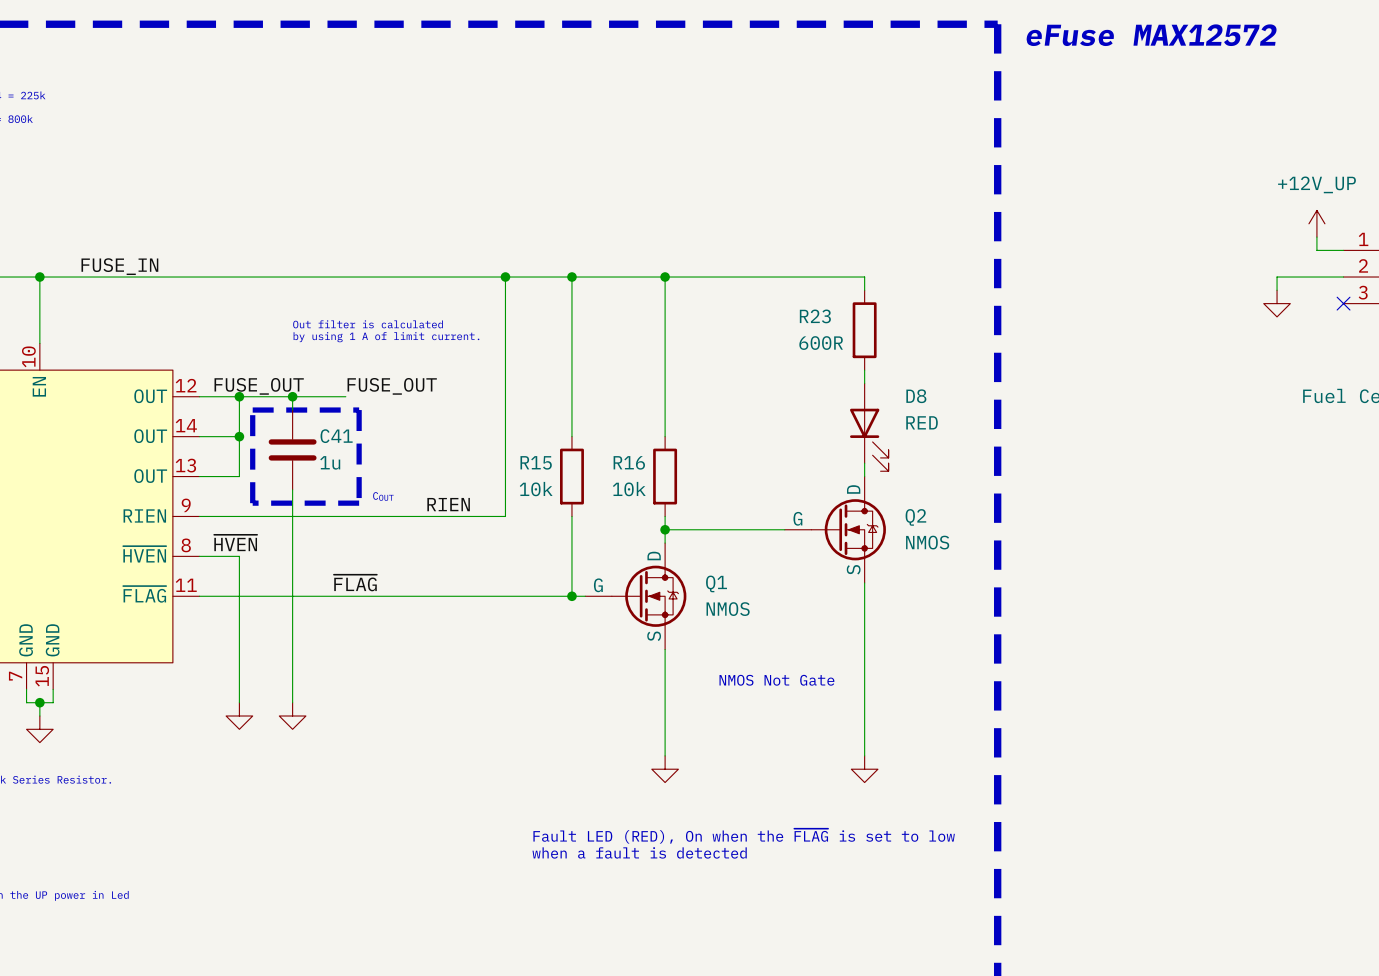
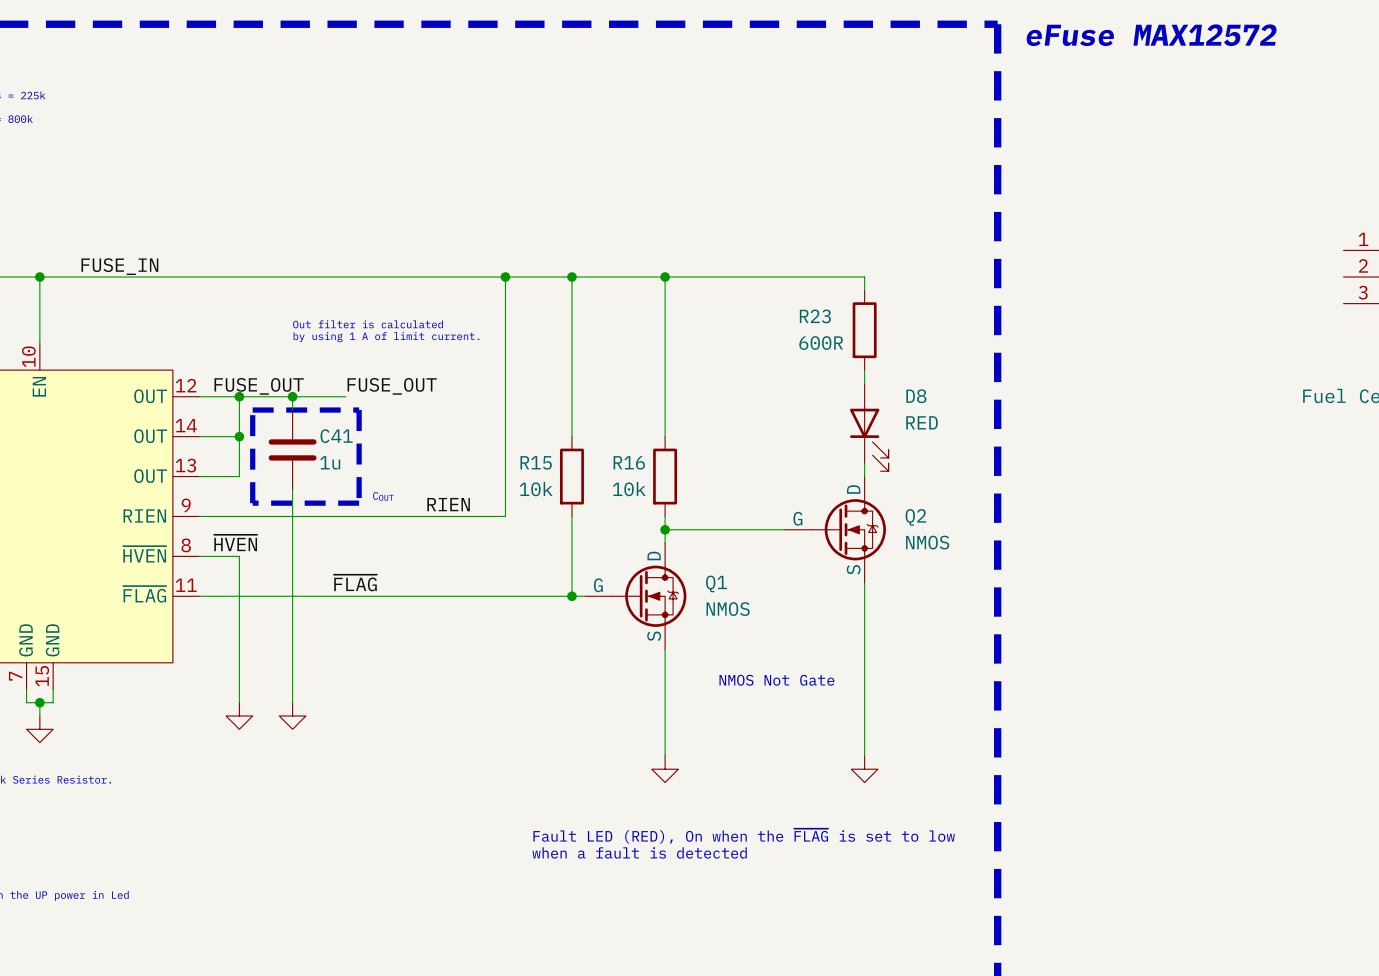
power symbol: +12V_UP (1316, 223) -> none
wire: (1316, 237) (1316, 250) (1343, 250) -> none
wire: (1343, 277) (1277, 277) (1277, 290) -> none
power symbol: (1277, 303) -> none
no-connect mark: (1343, 303) -> none

